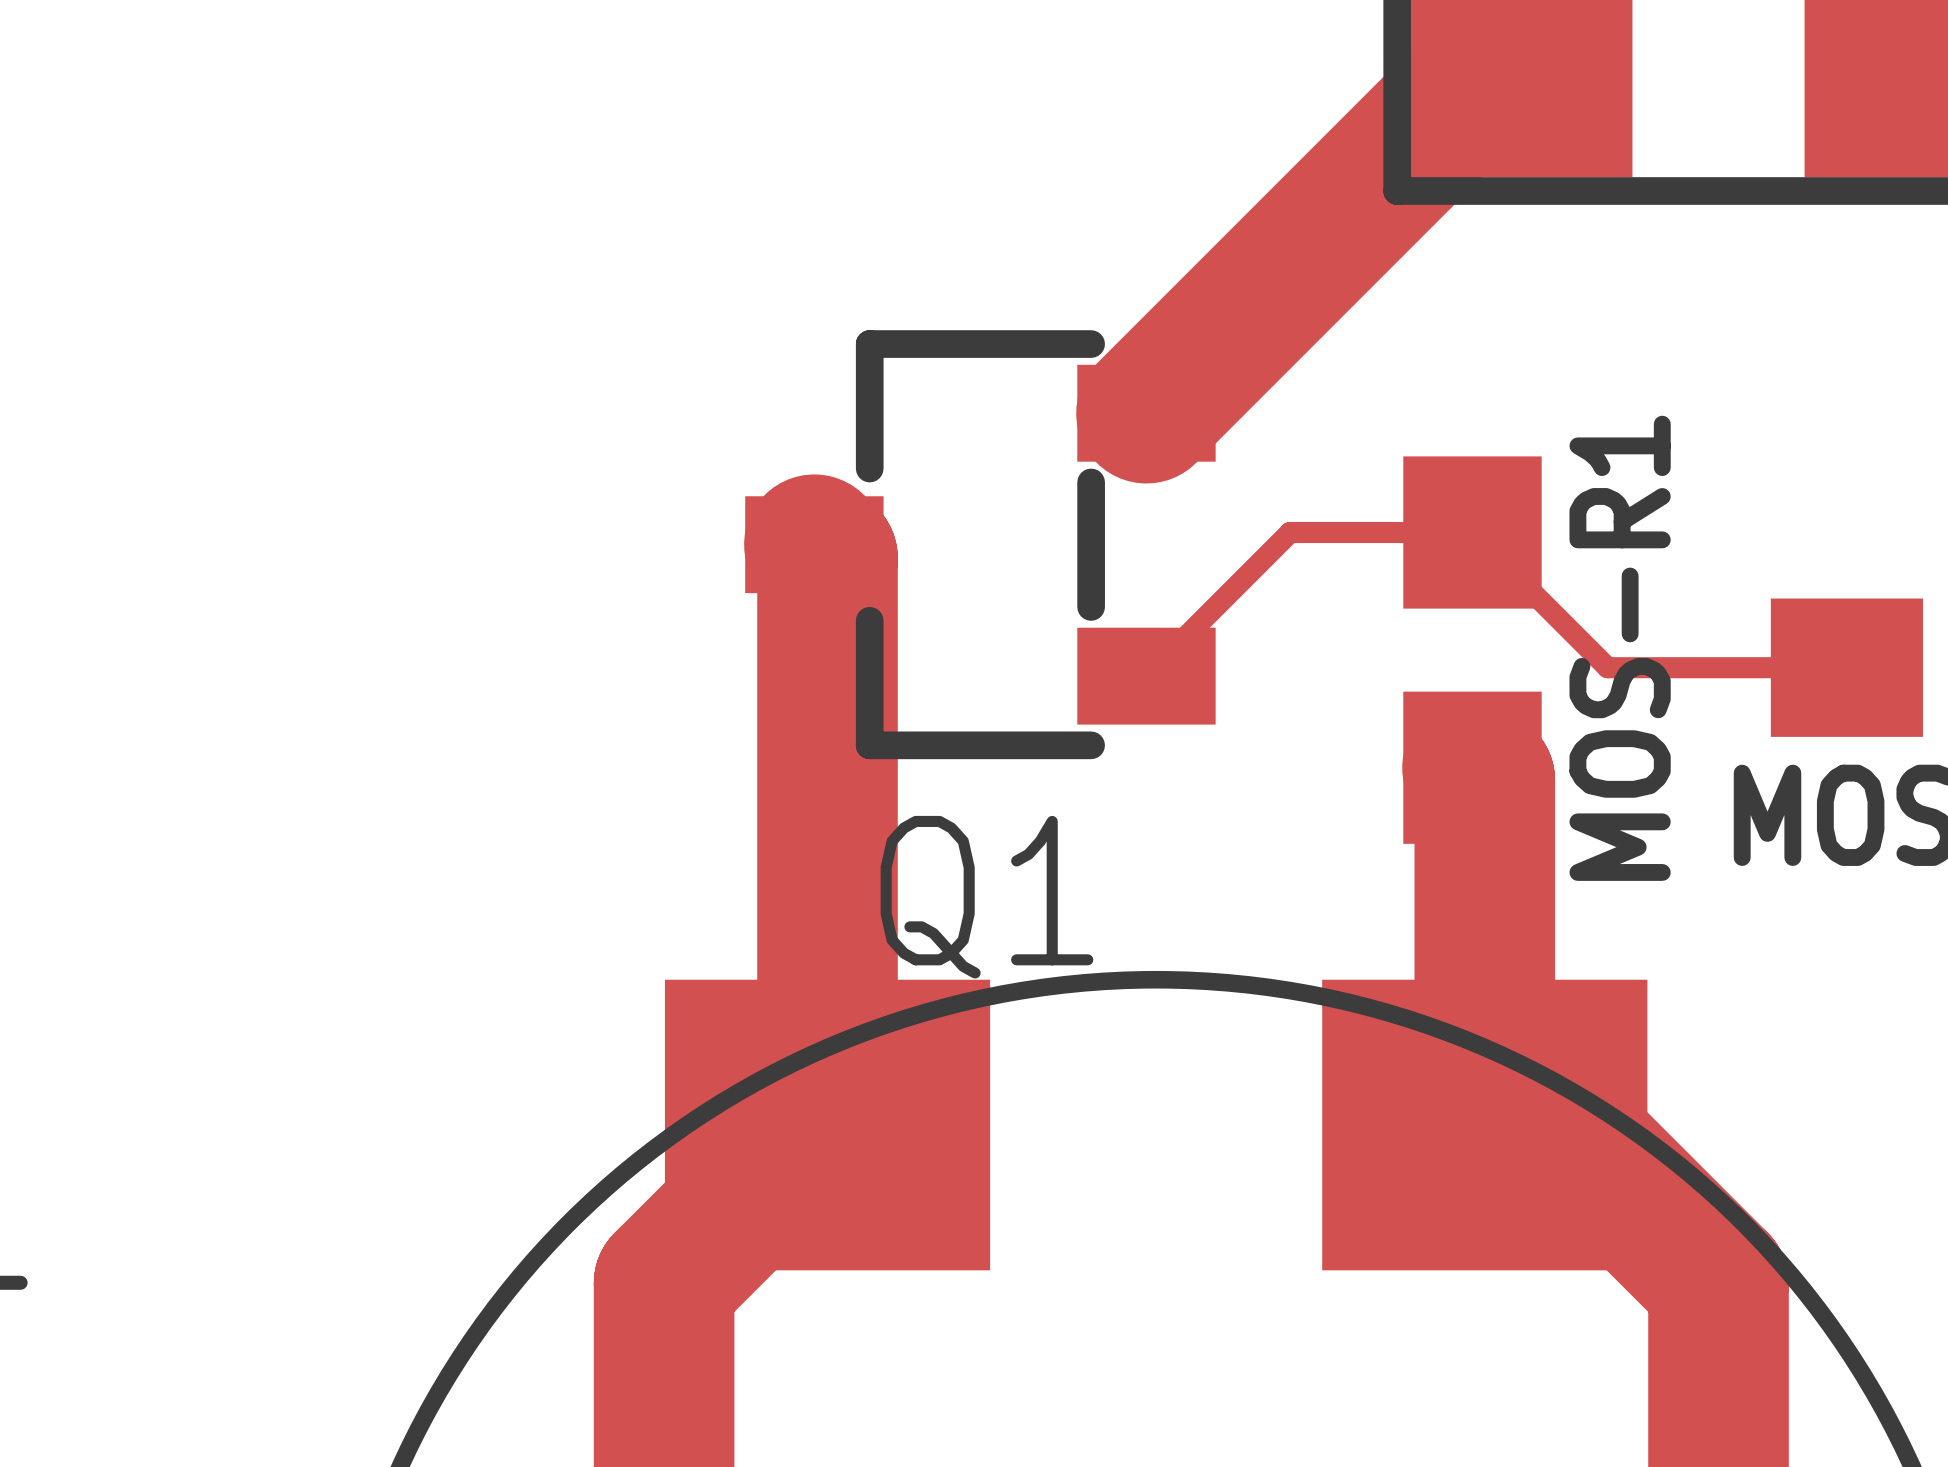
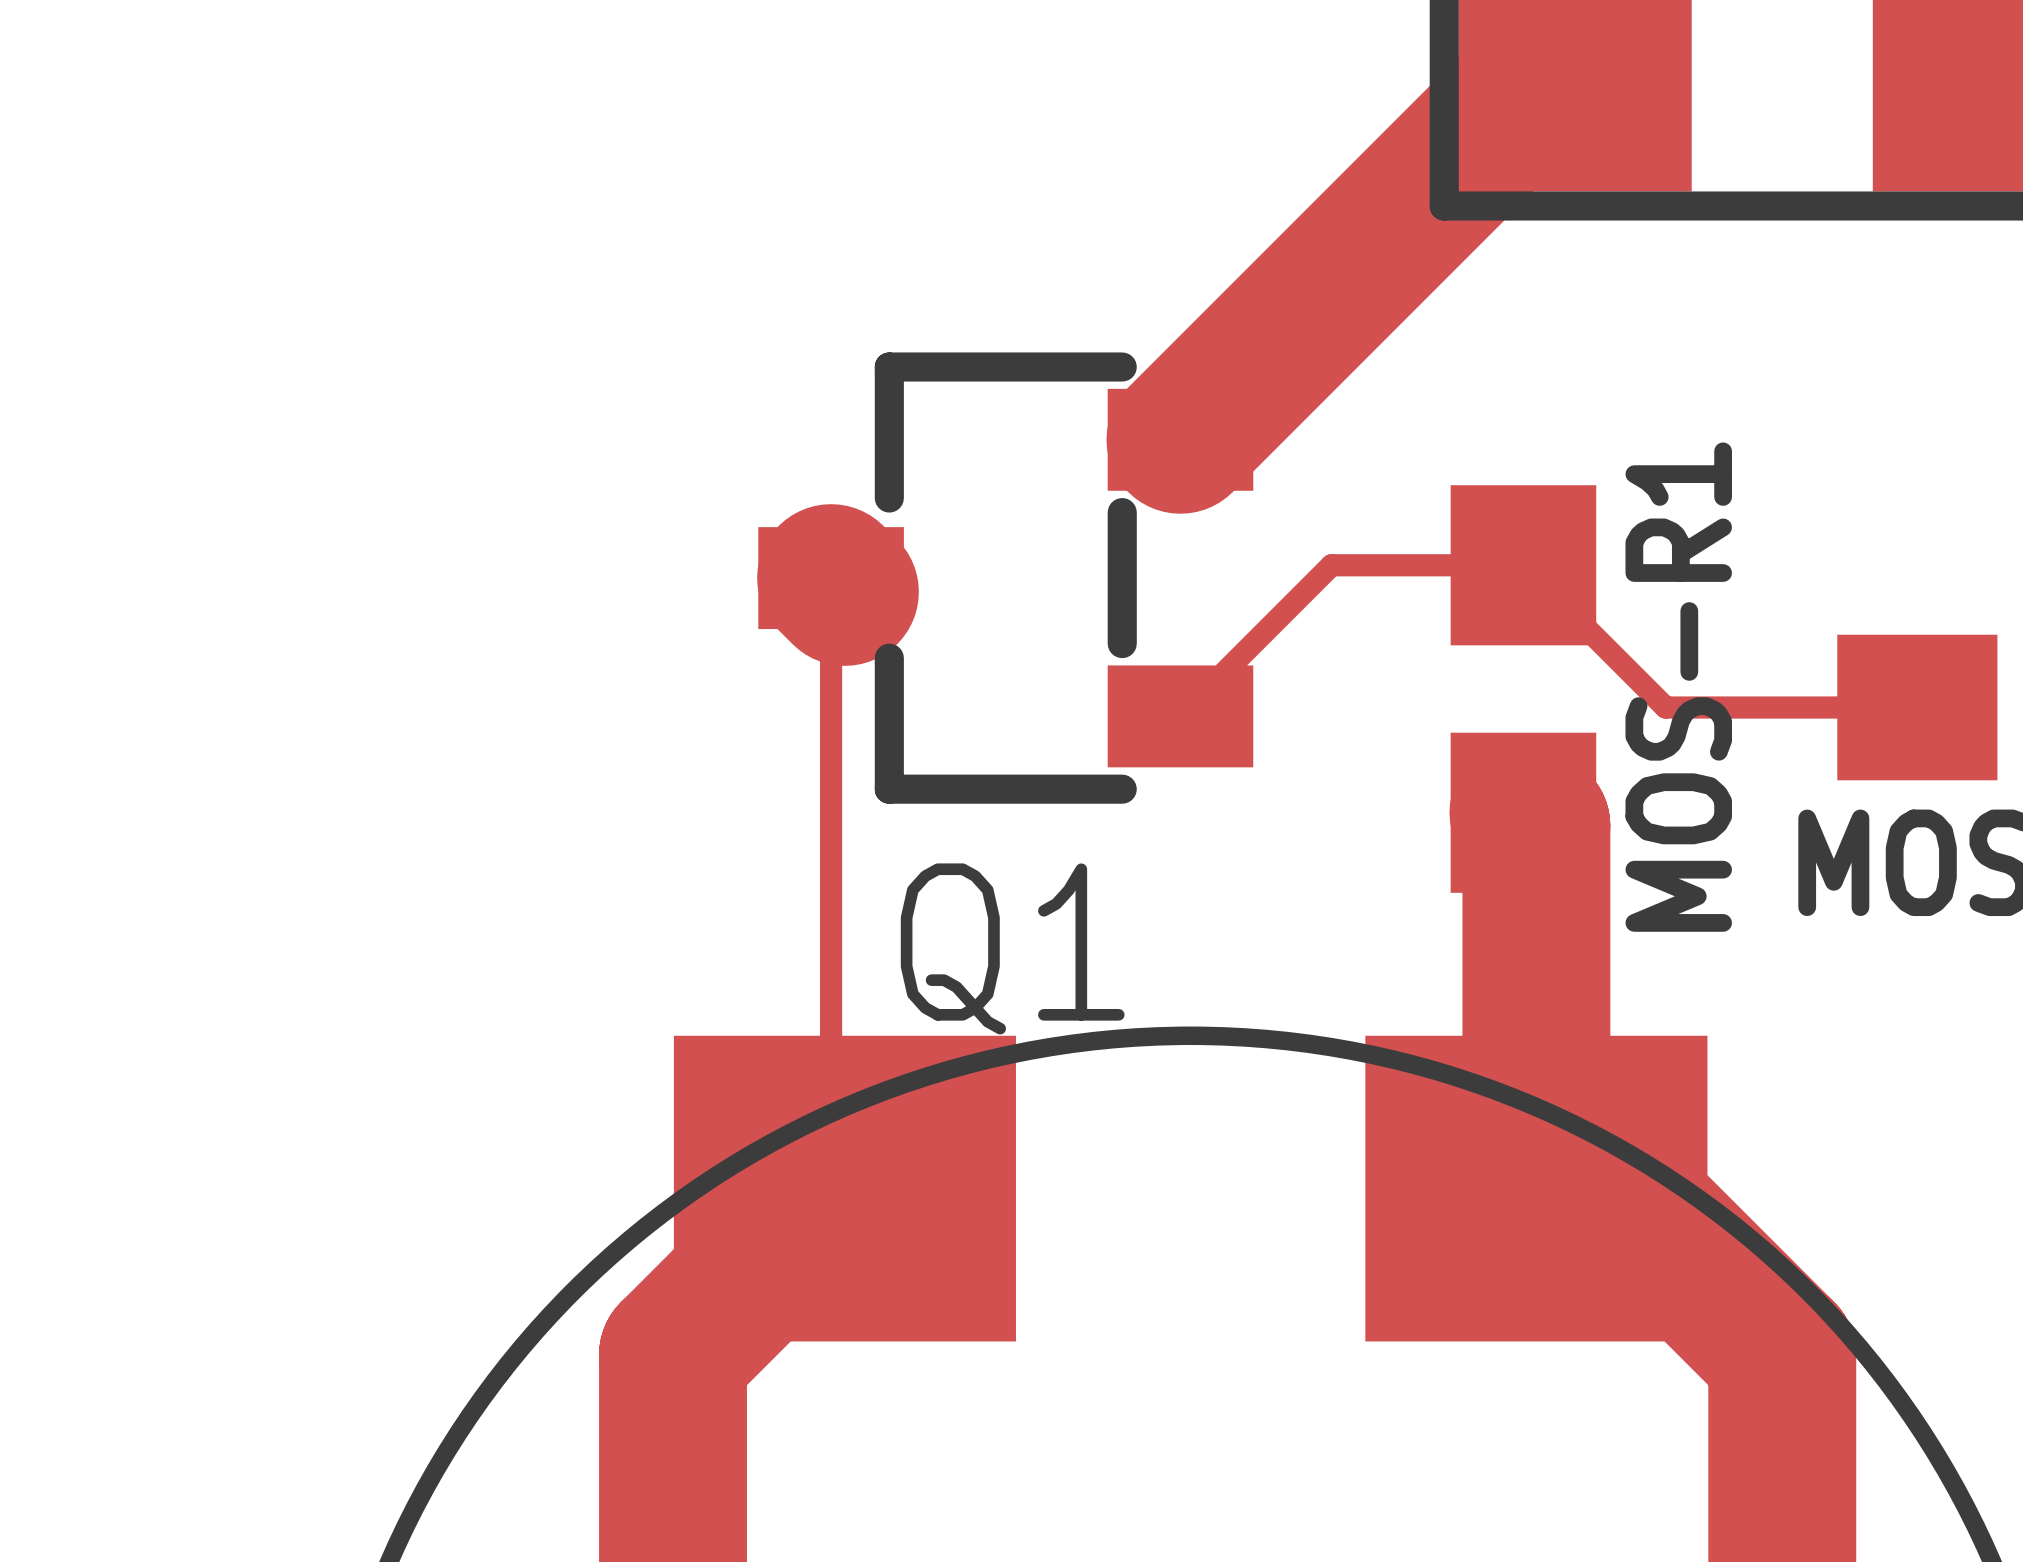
top track: (827, 557) (827, 1125) -> (831, 578) (831, 1174) (844, 1188)

